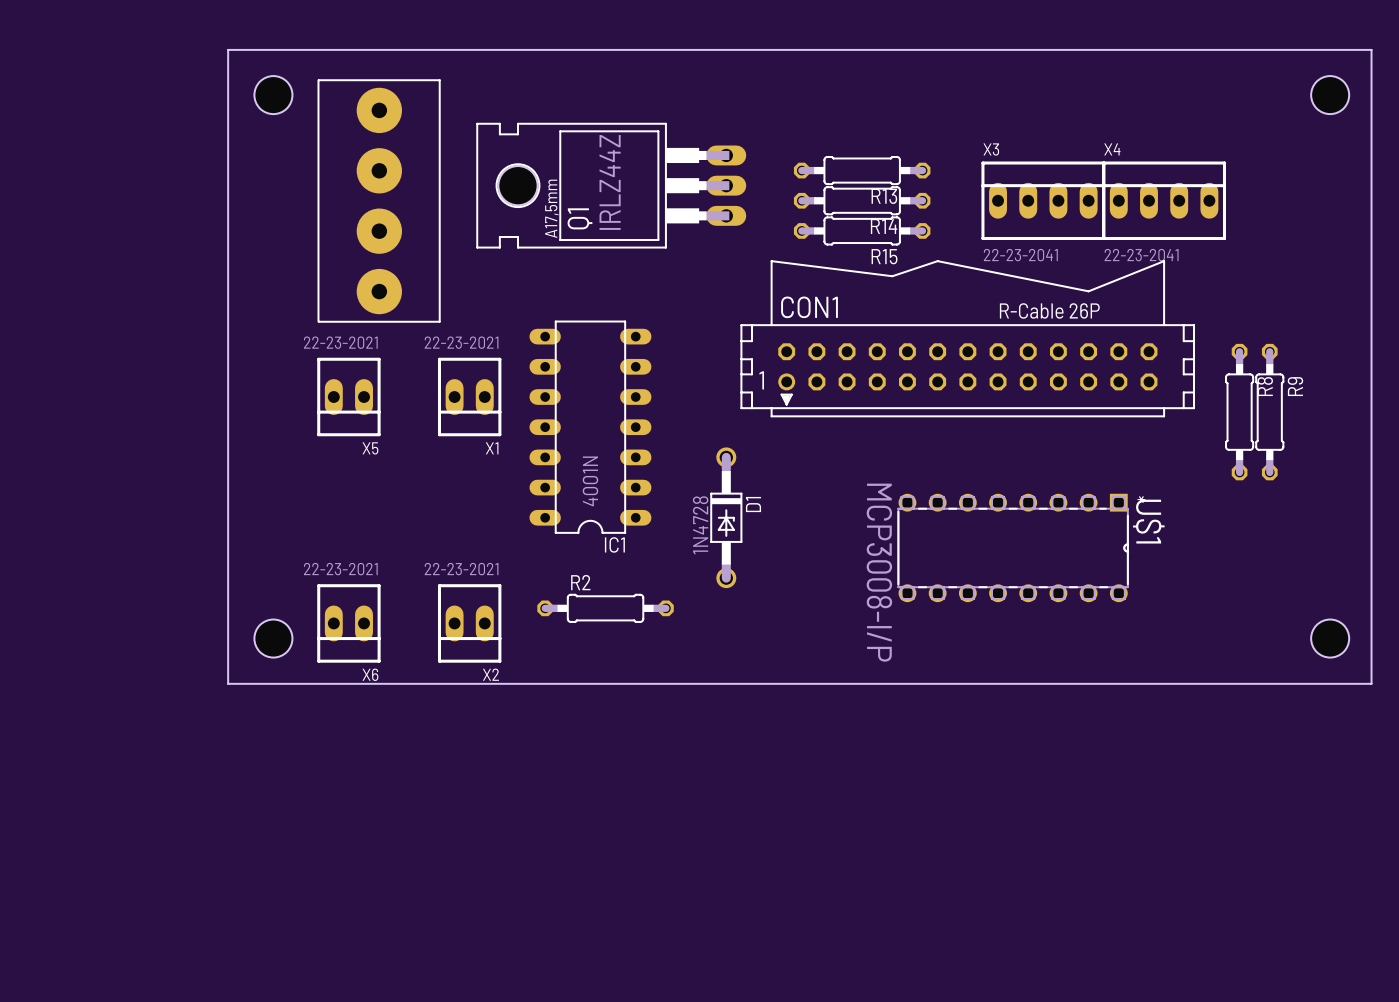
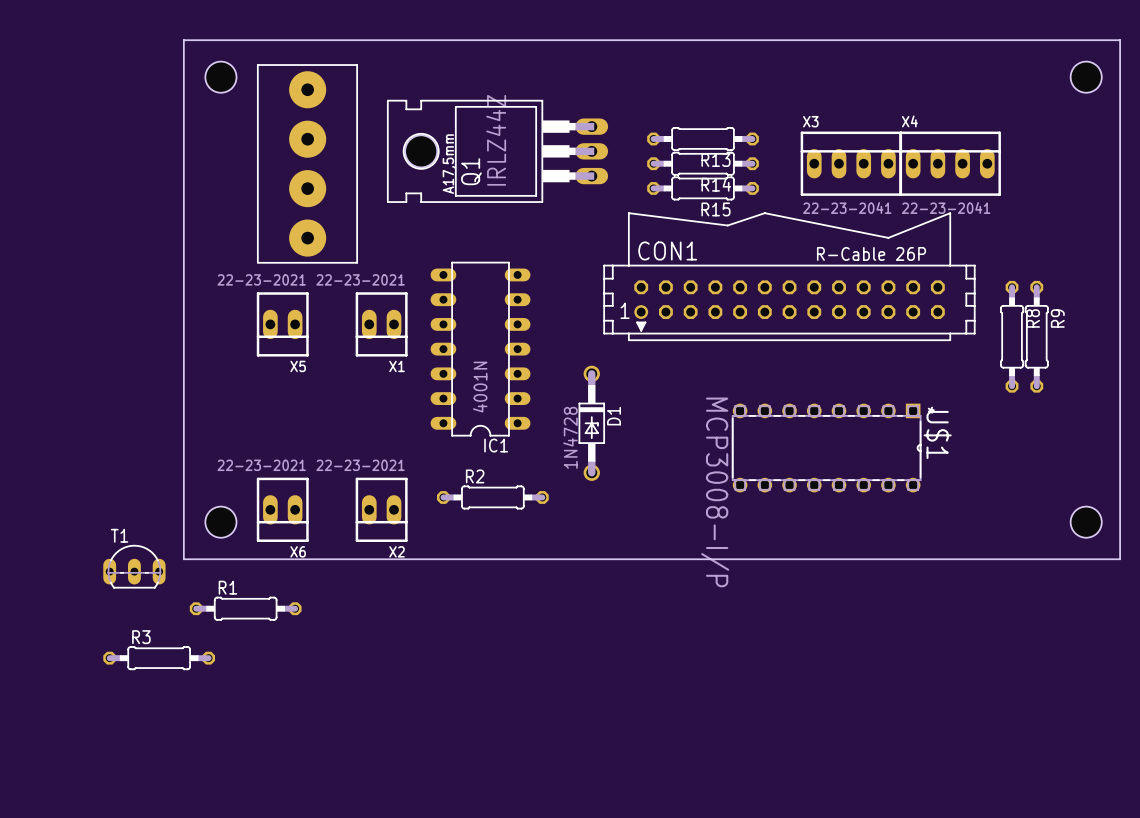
T1: none -> (134, 566)
R1: none -> (245, 608)
R3: none -> (159, 658)

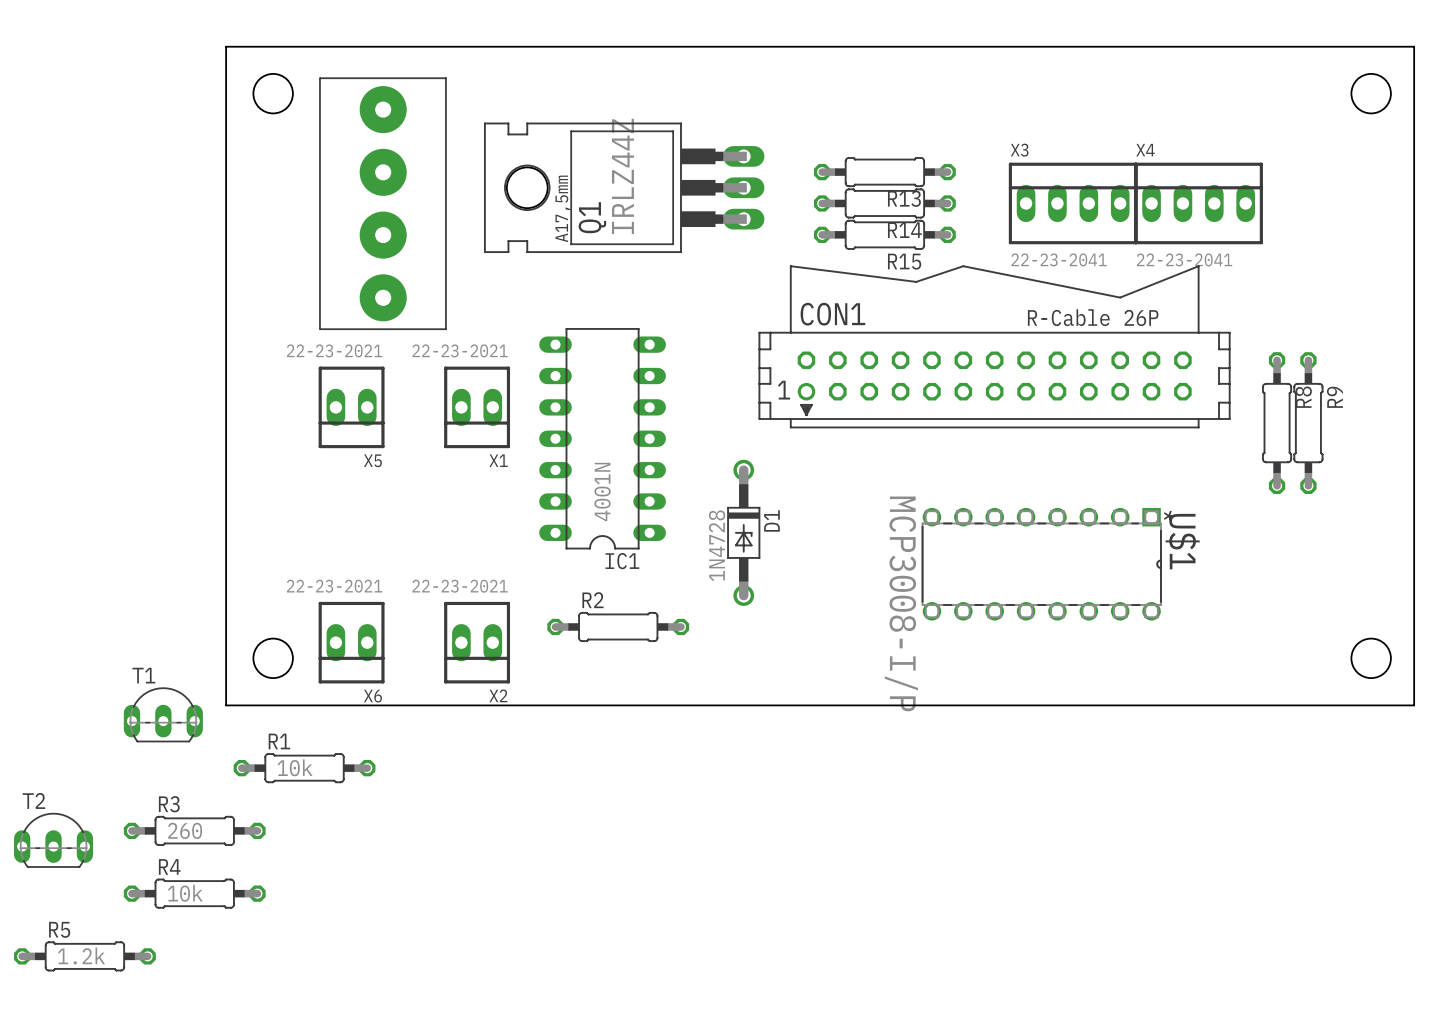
R1 value: none -> 10k (295, 767)
R3 value: none -> 260 (185, 830)
T2: none -> (53, 840)
R4: none -> 10k (194, 893)
R5: none -> 1.2k (84, 956)

